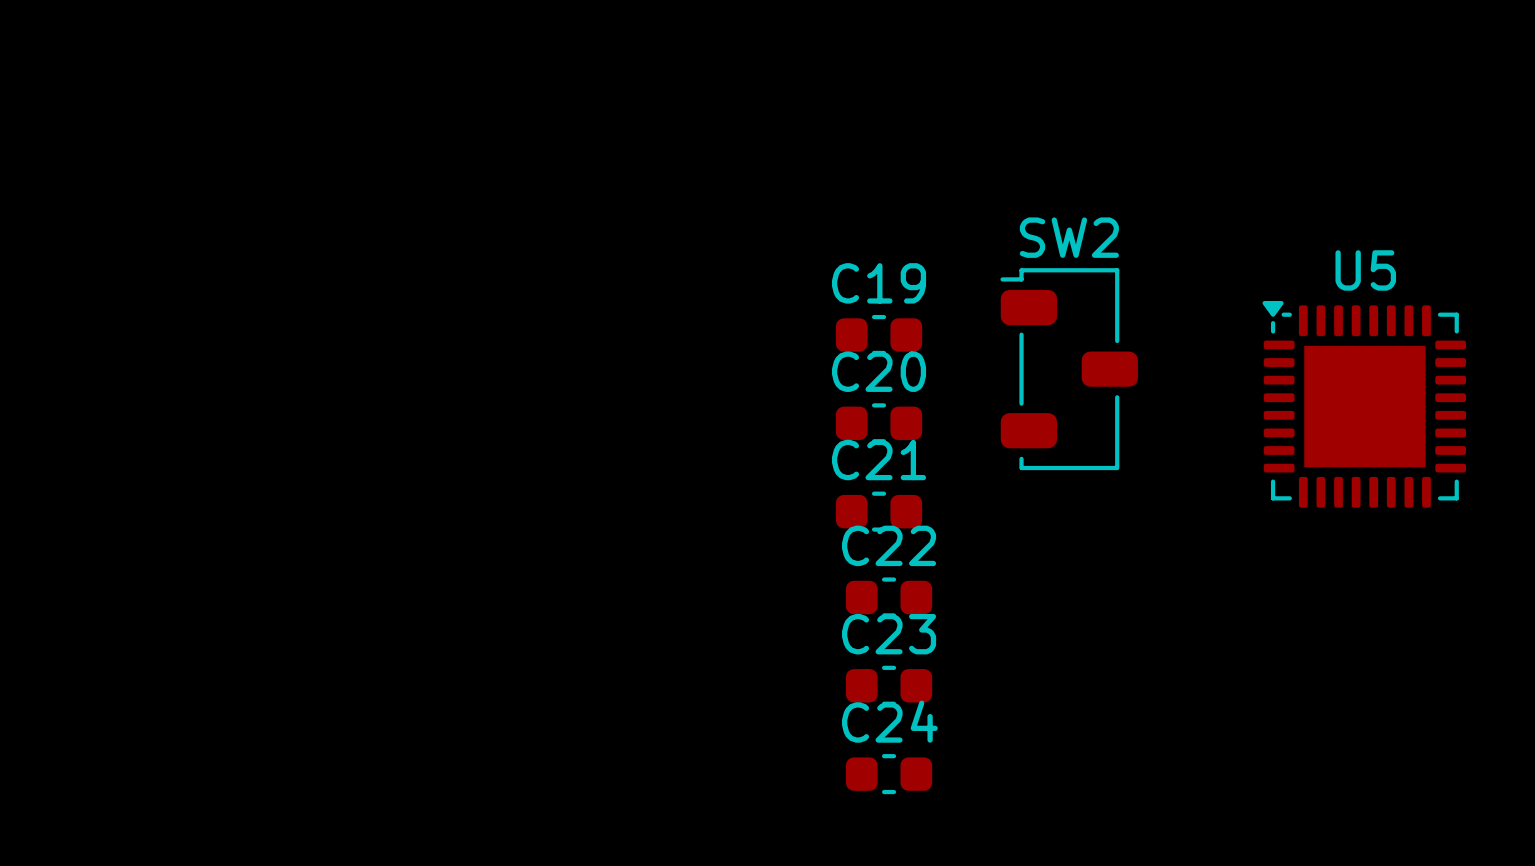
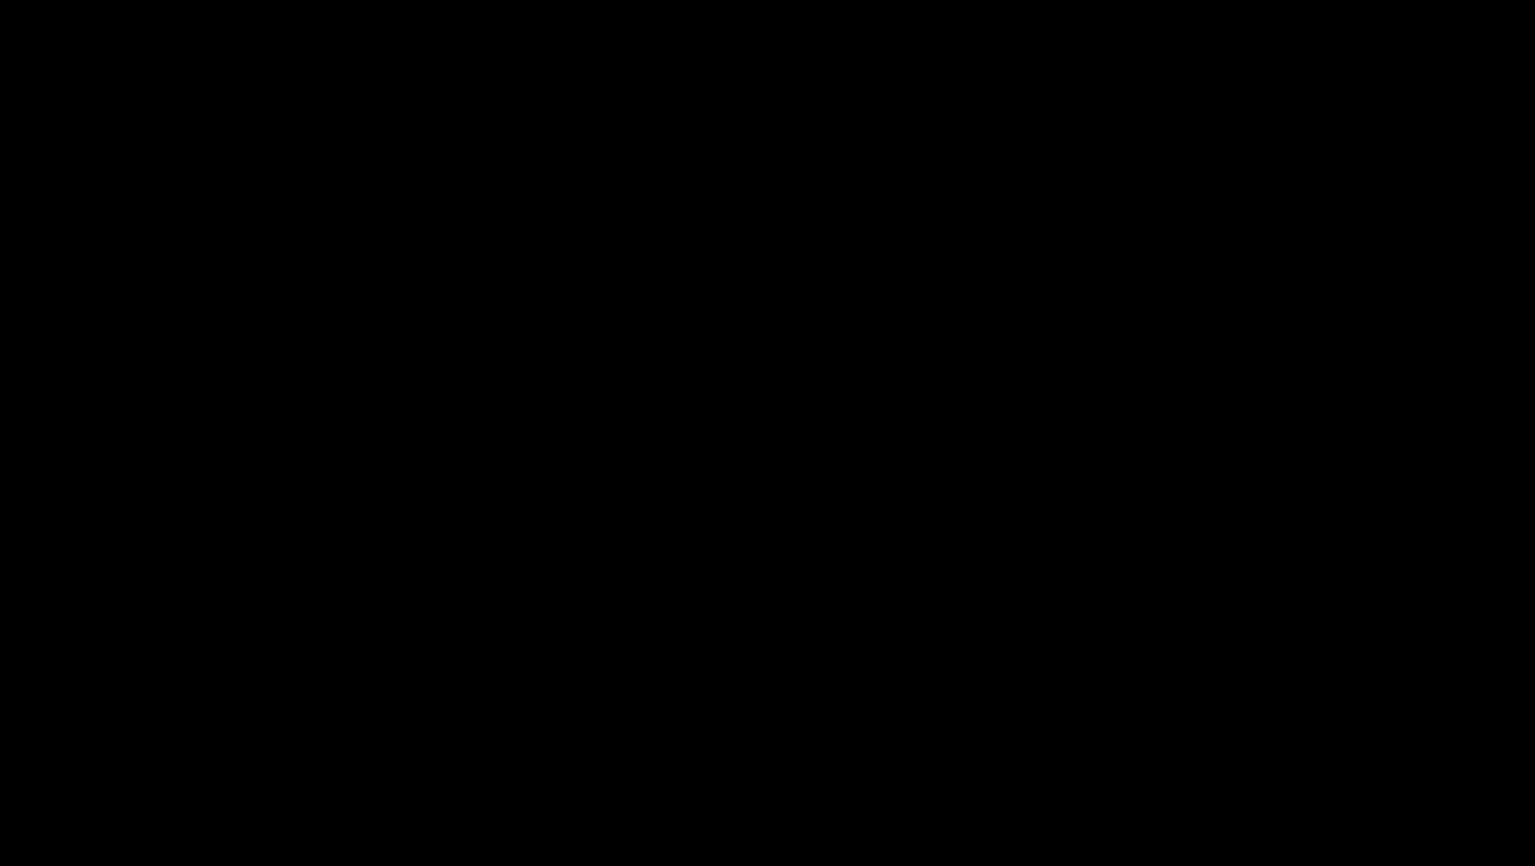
C19: (879, 335) -> none
SW2: (1069, 369) -> none
U5: (1364, 404) -> none
C20: (879, 423) -> none
C21: (879, 511) -> none
C22: (889, 597) -> none
C23: (889, 685) -> none
C24: (889, 774) -> none

